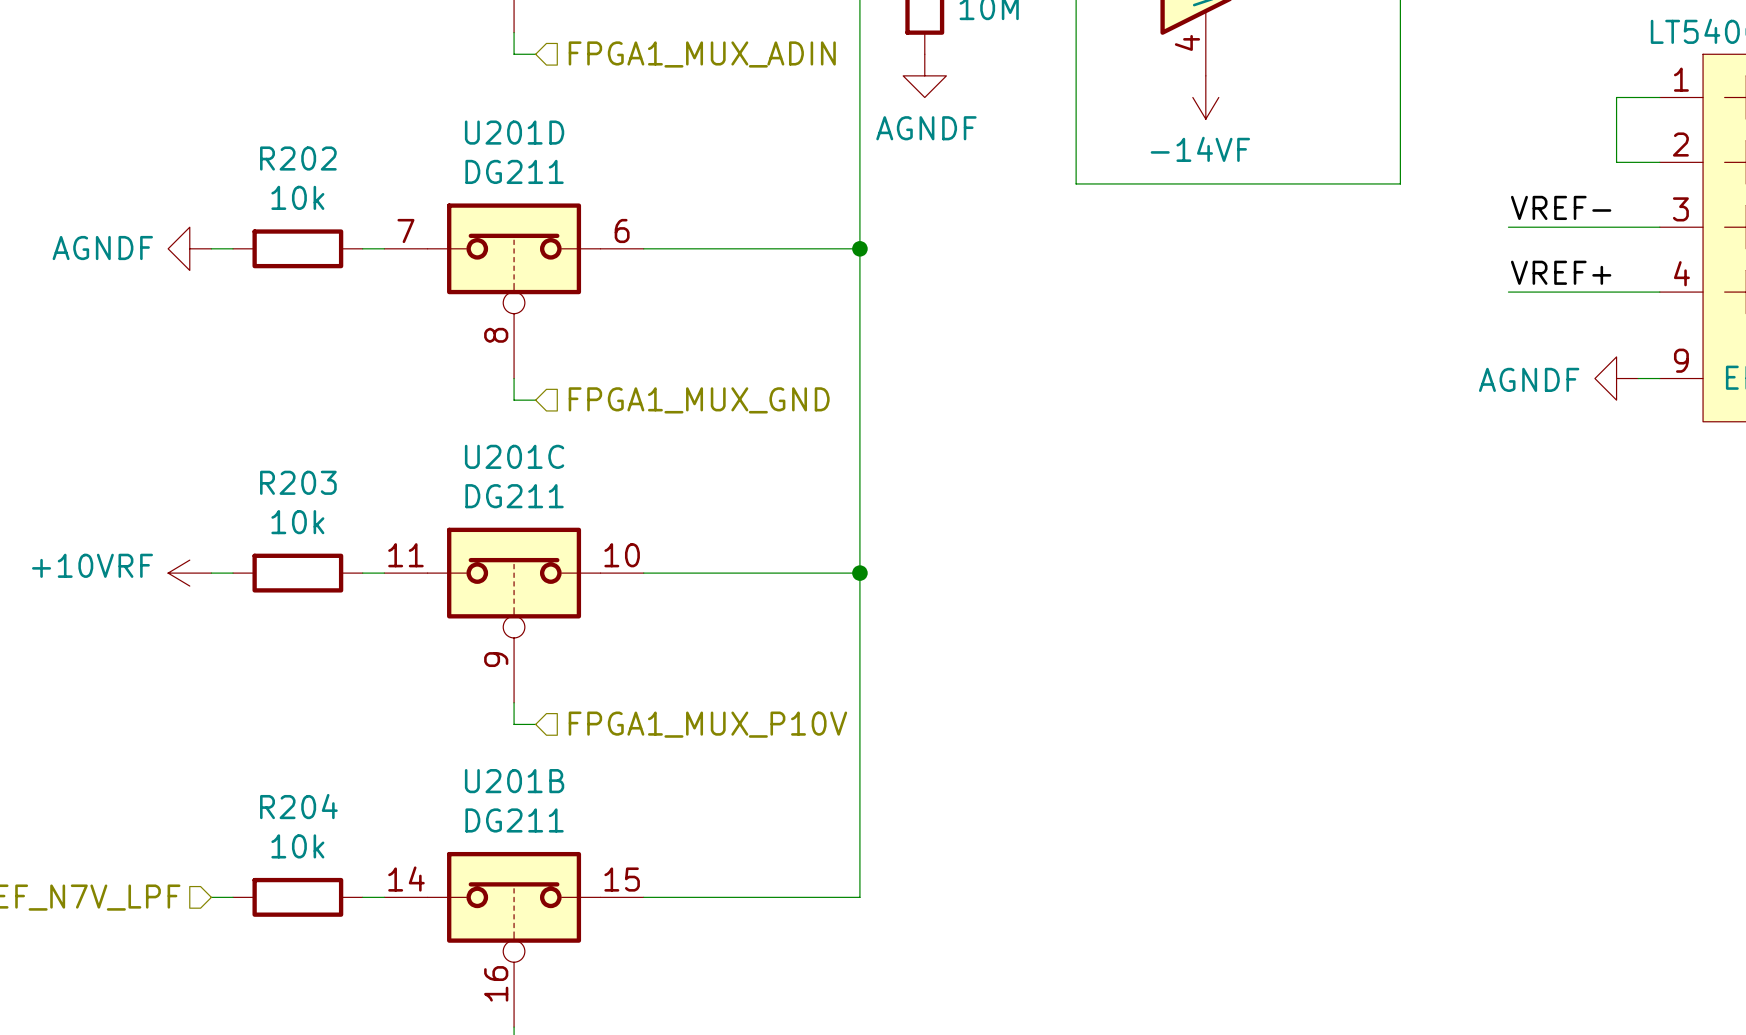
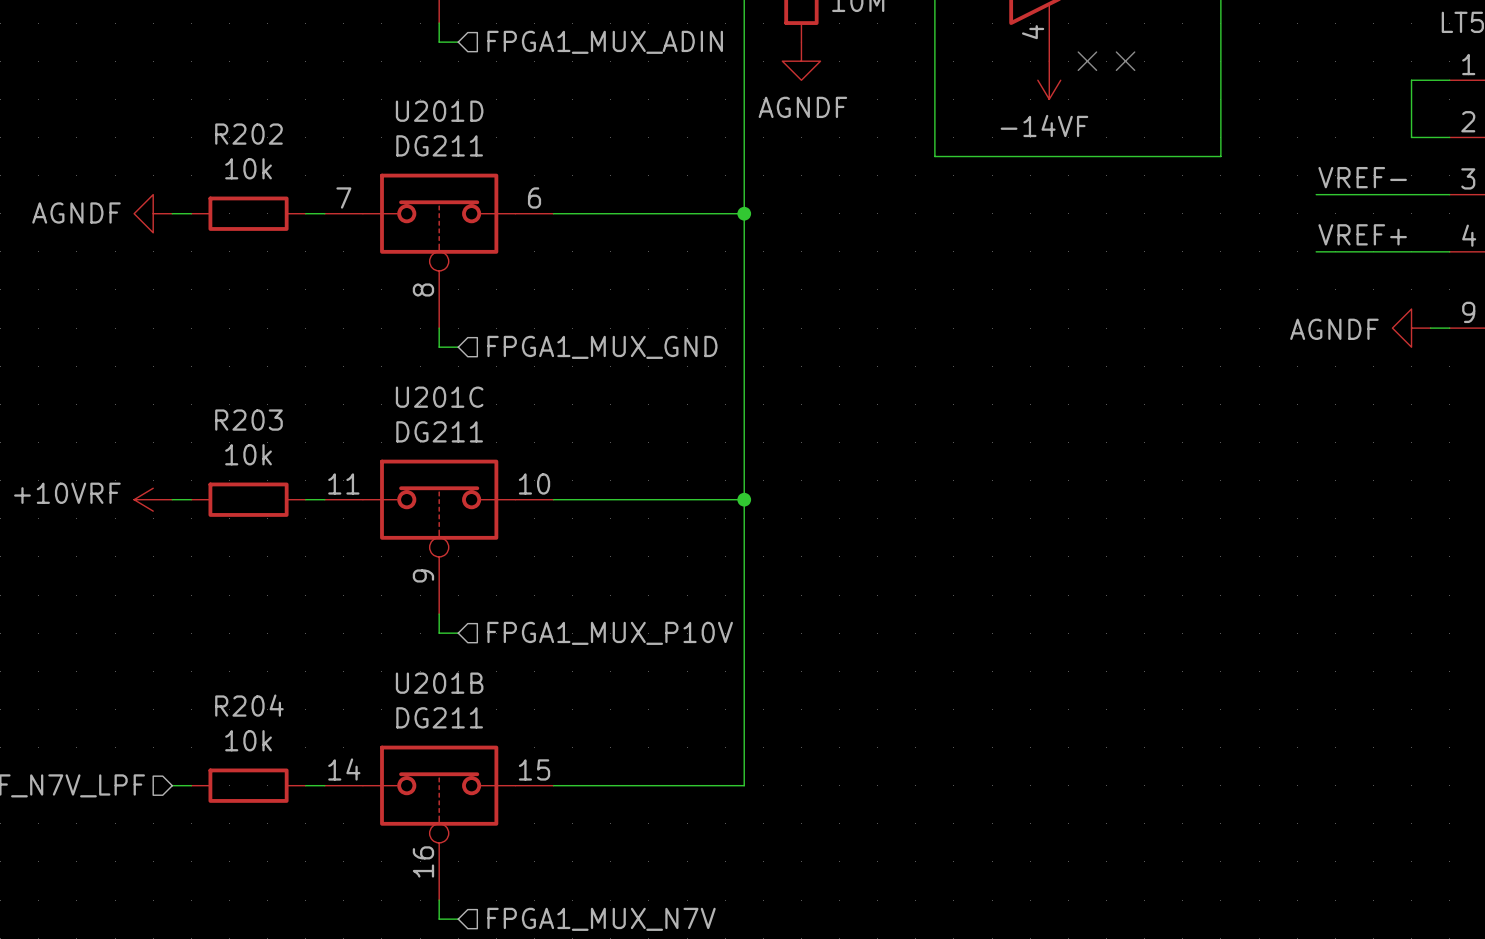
no-connect mark: none -> (1087, 61)
no-connect mark: none -> (1125, 61)

